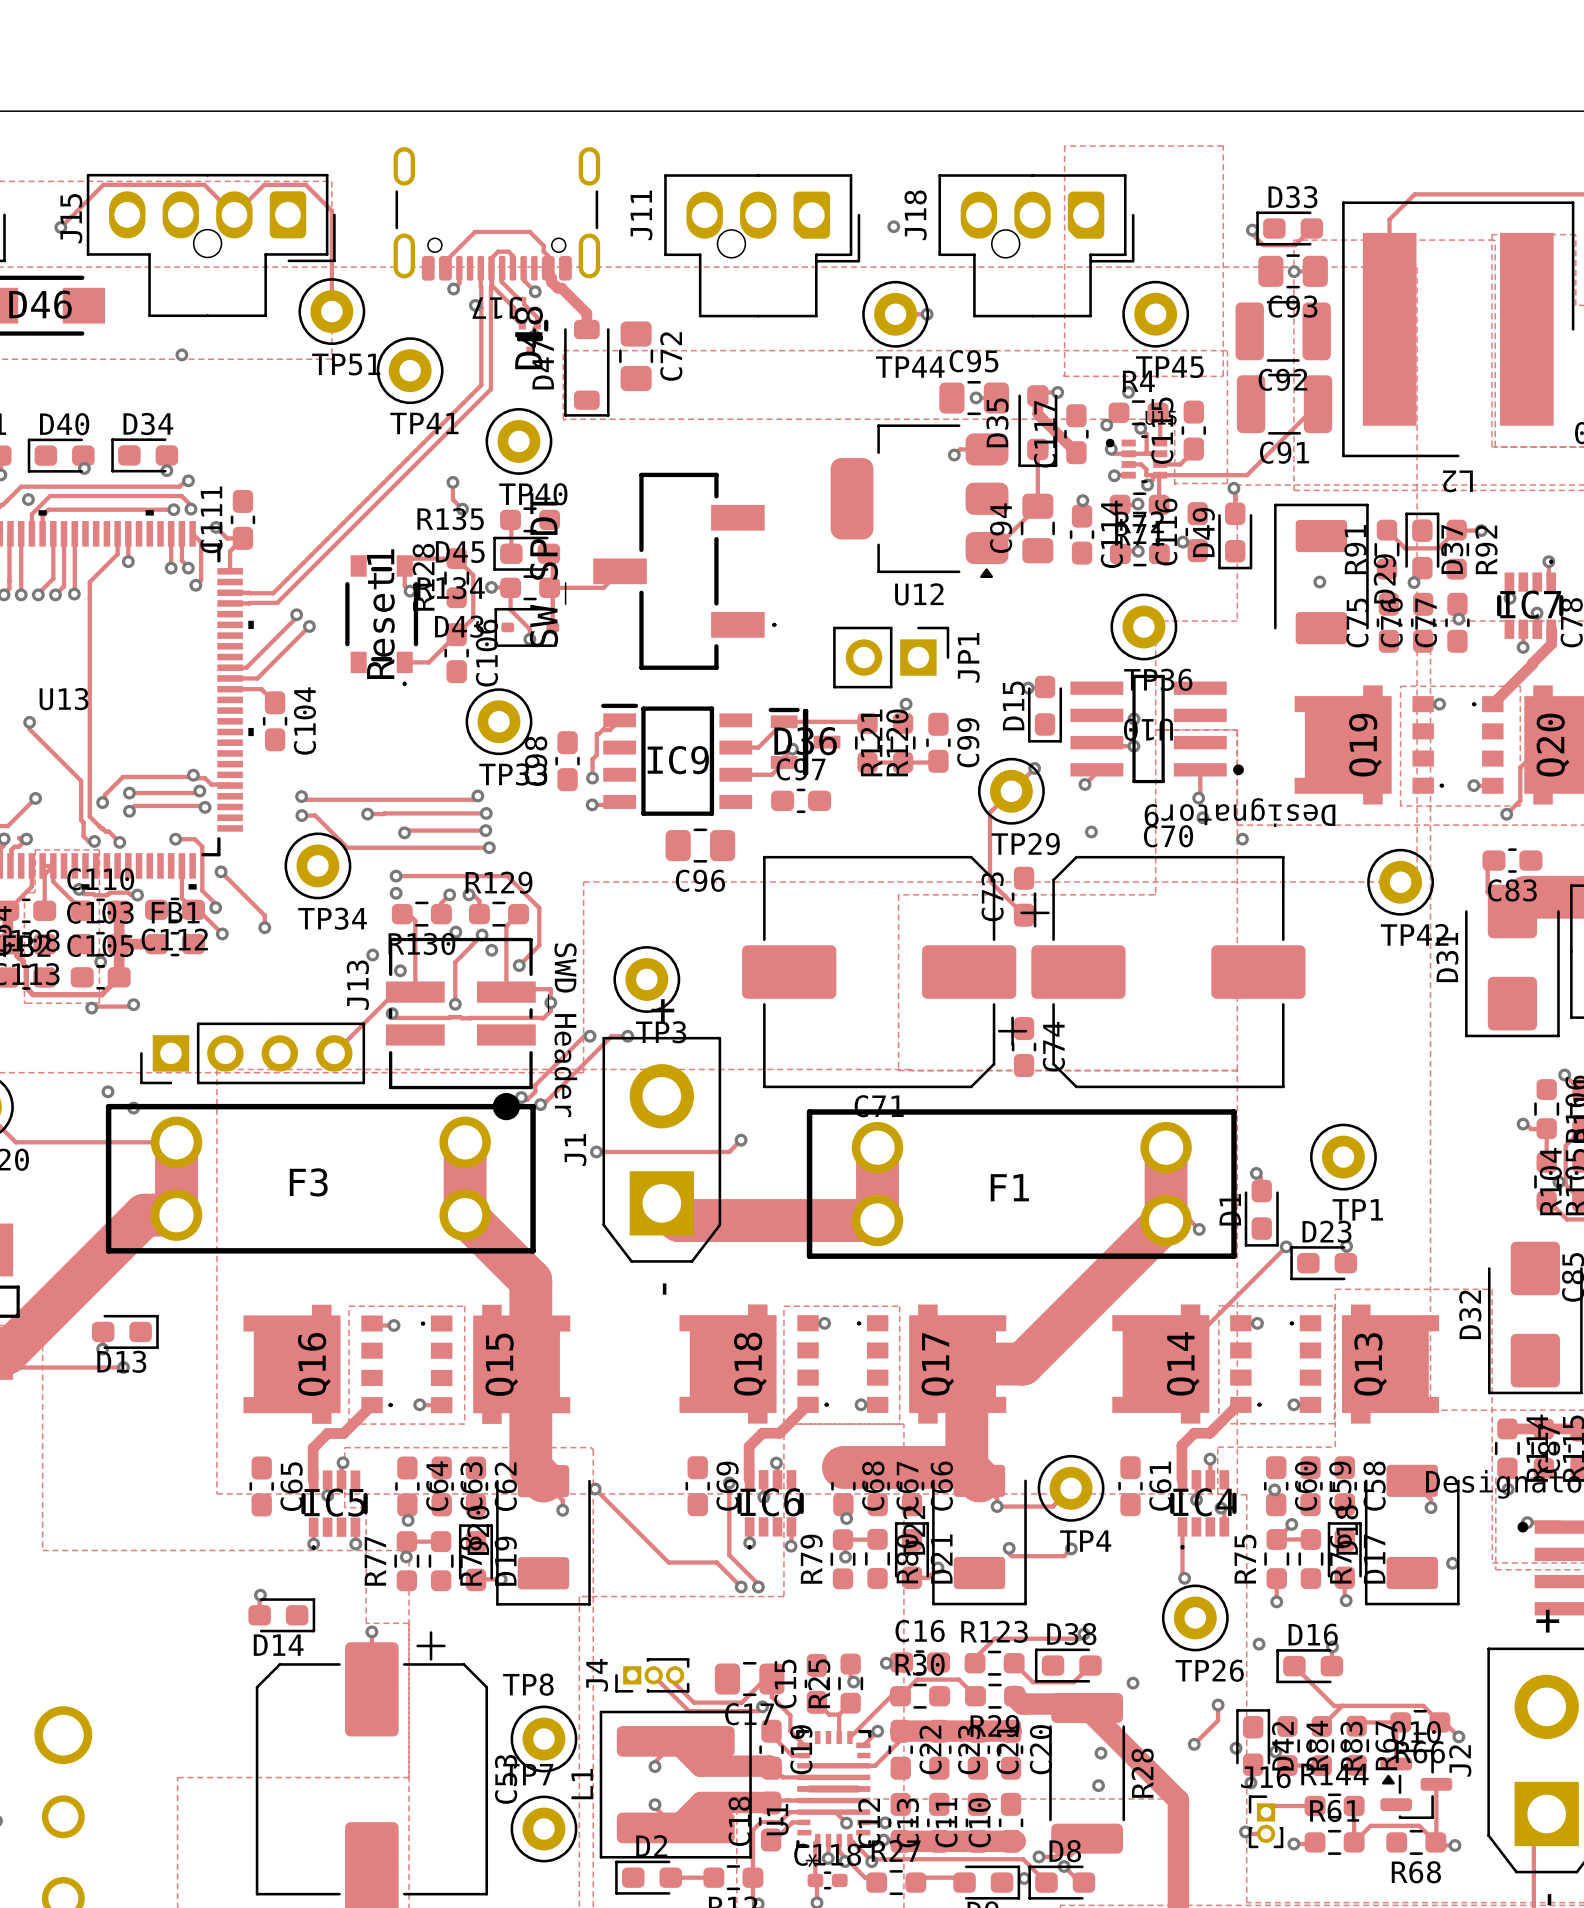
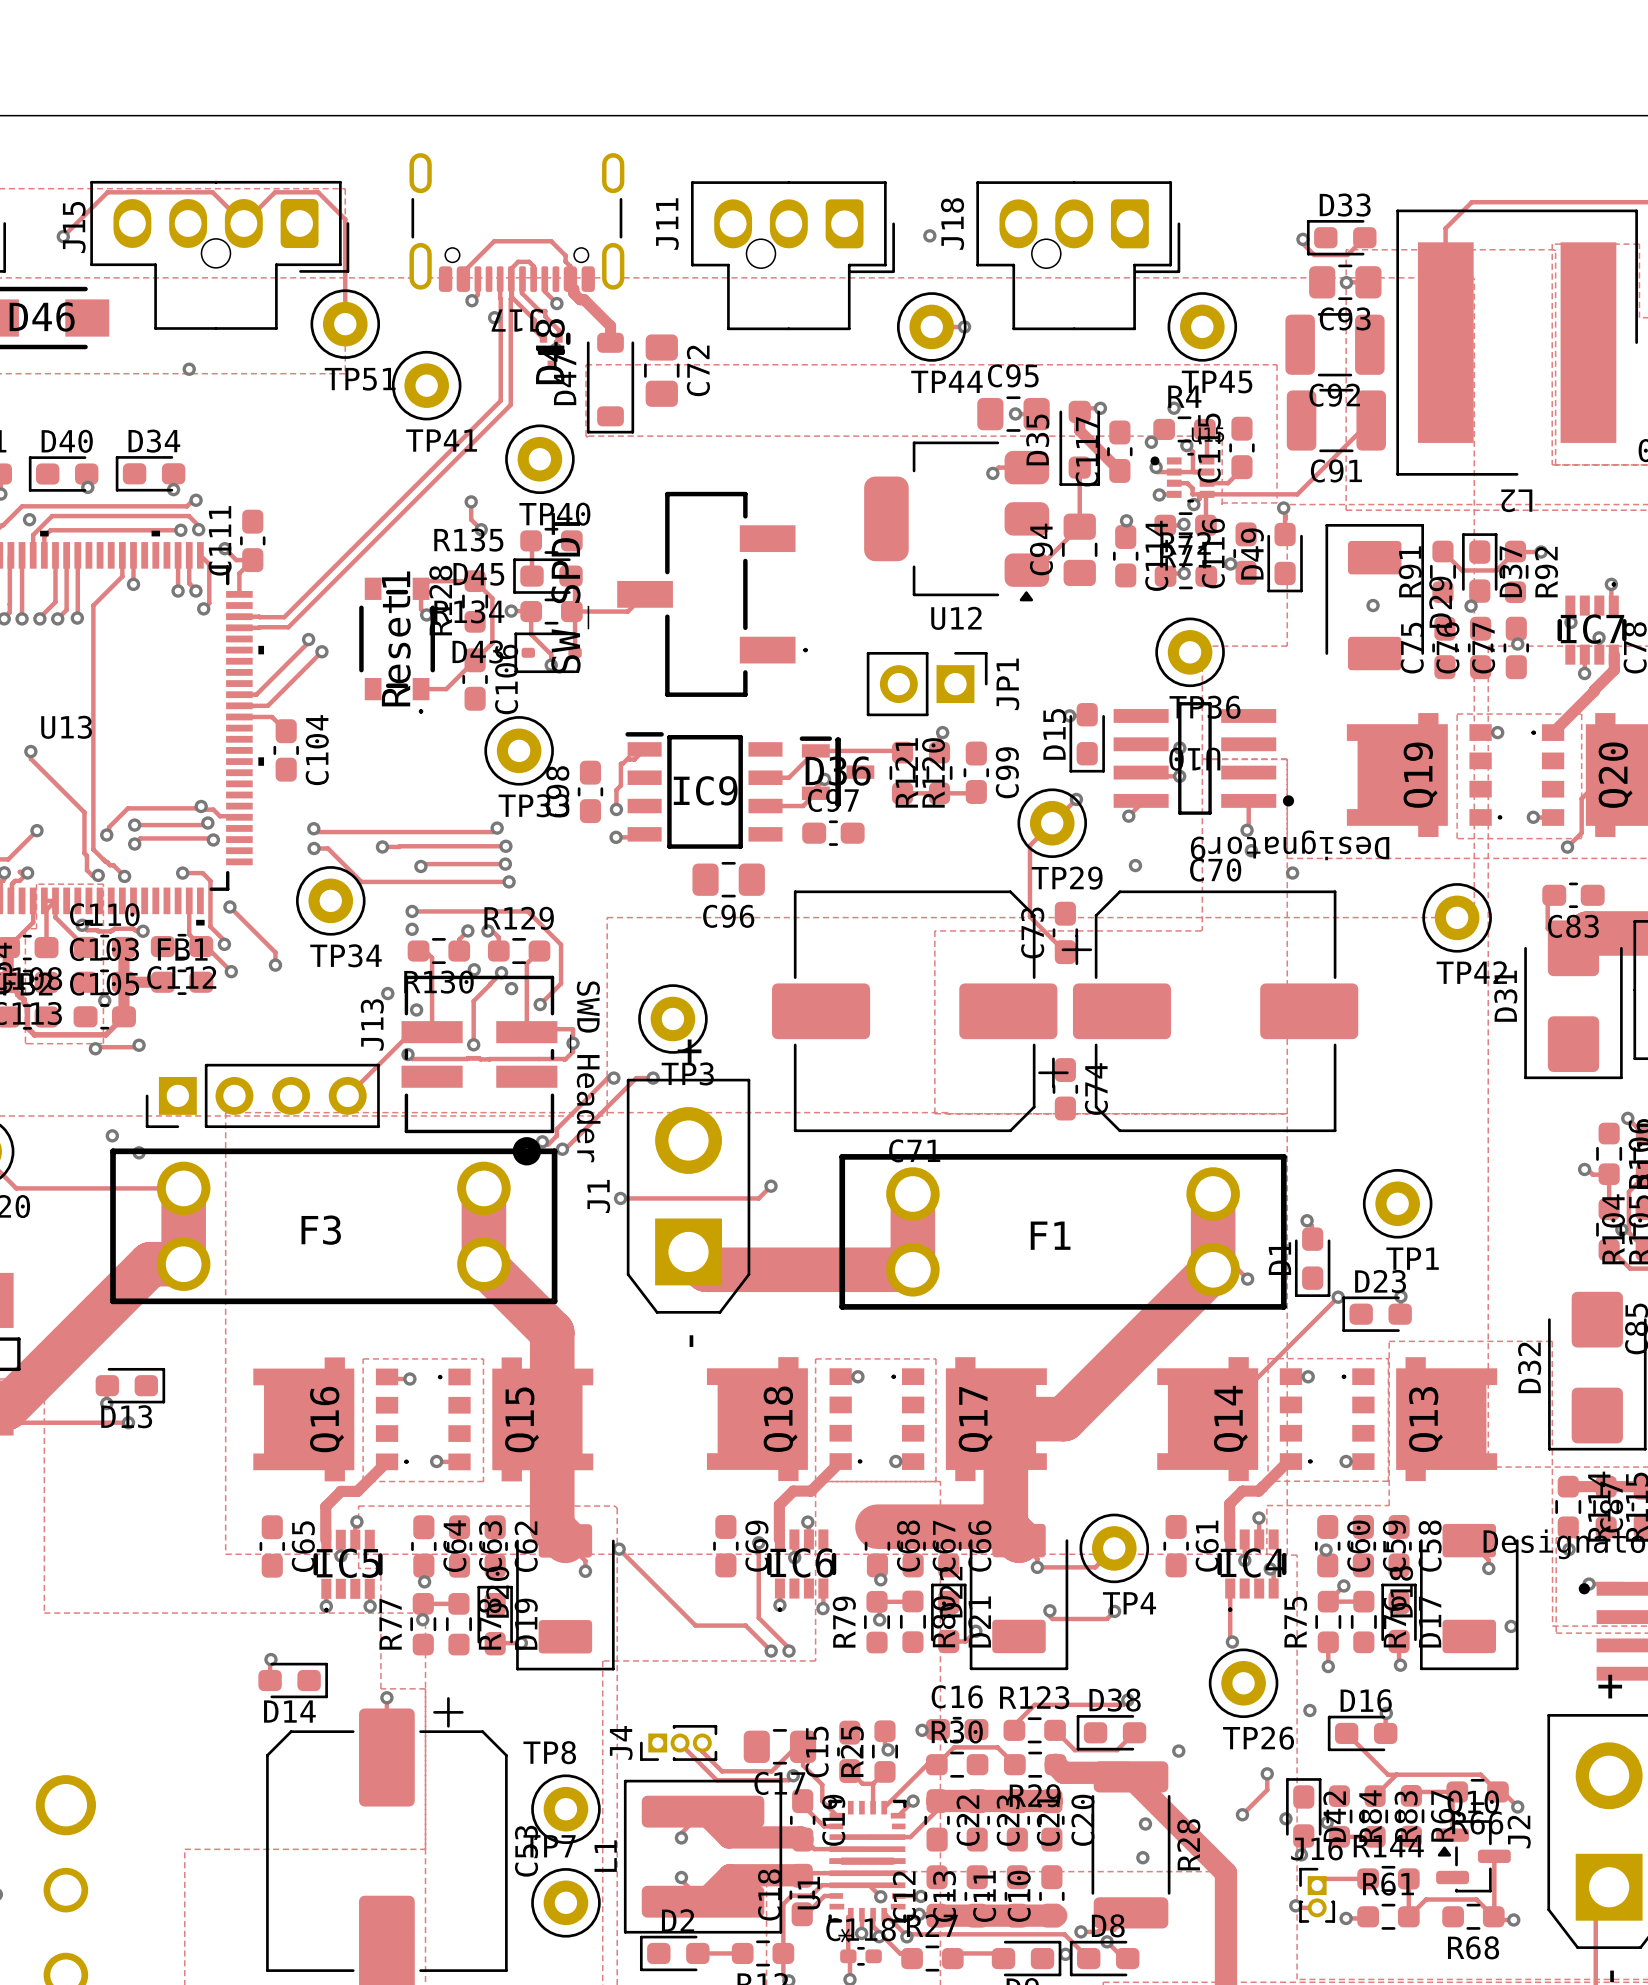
zone outline: (1064, 375) (1063, 376) (1223, 376) (1223, 146) (1064, 146) (1064, 376) -> none

